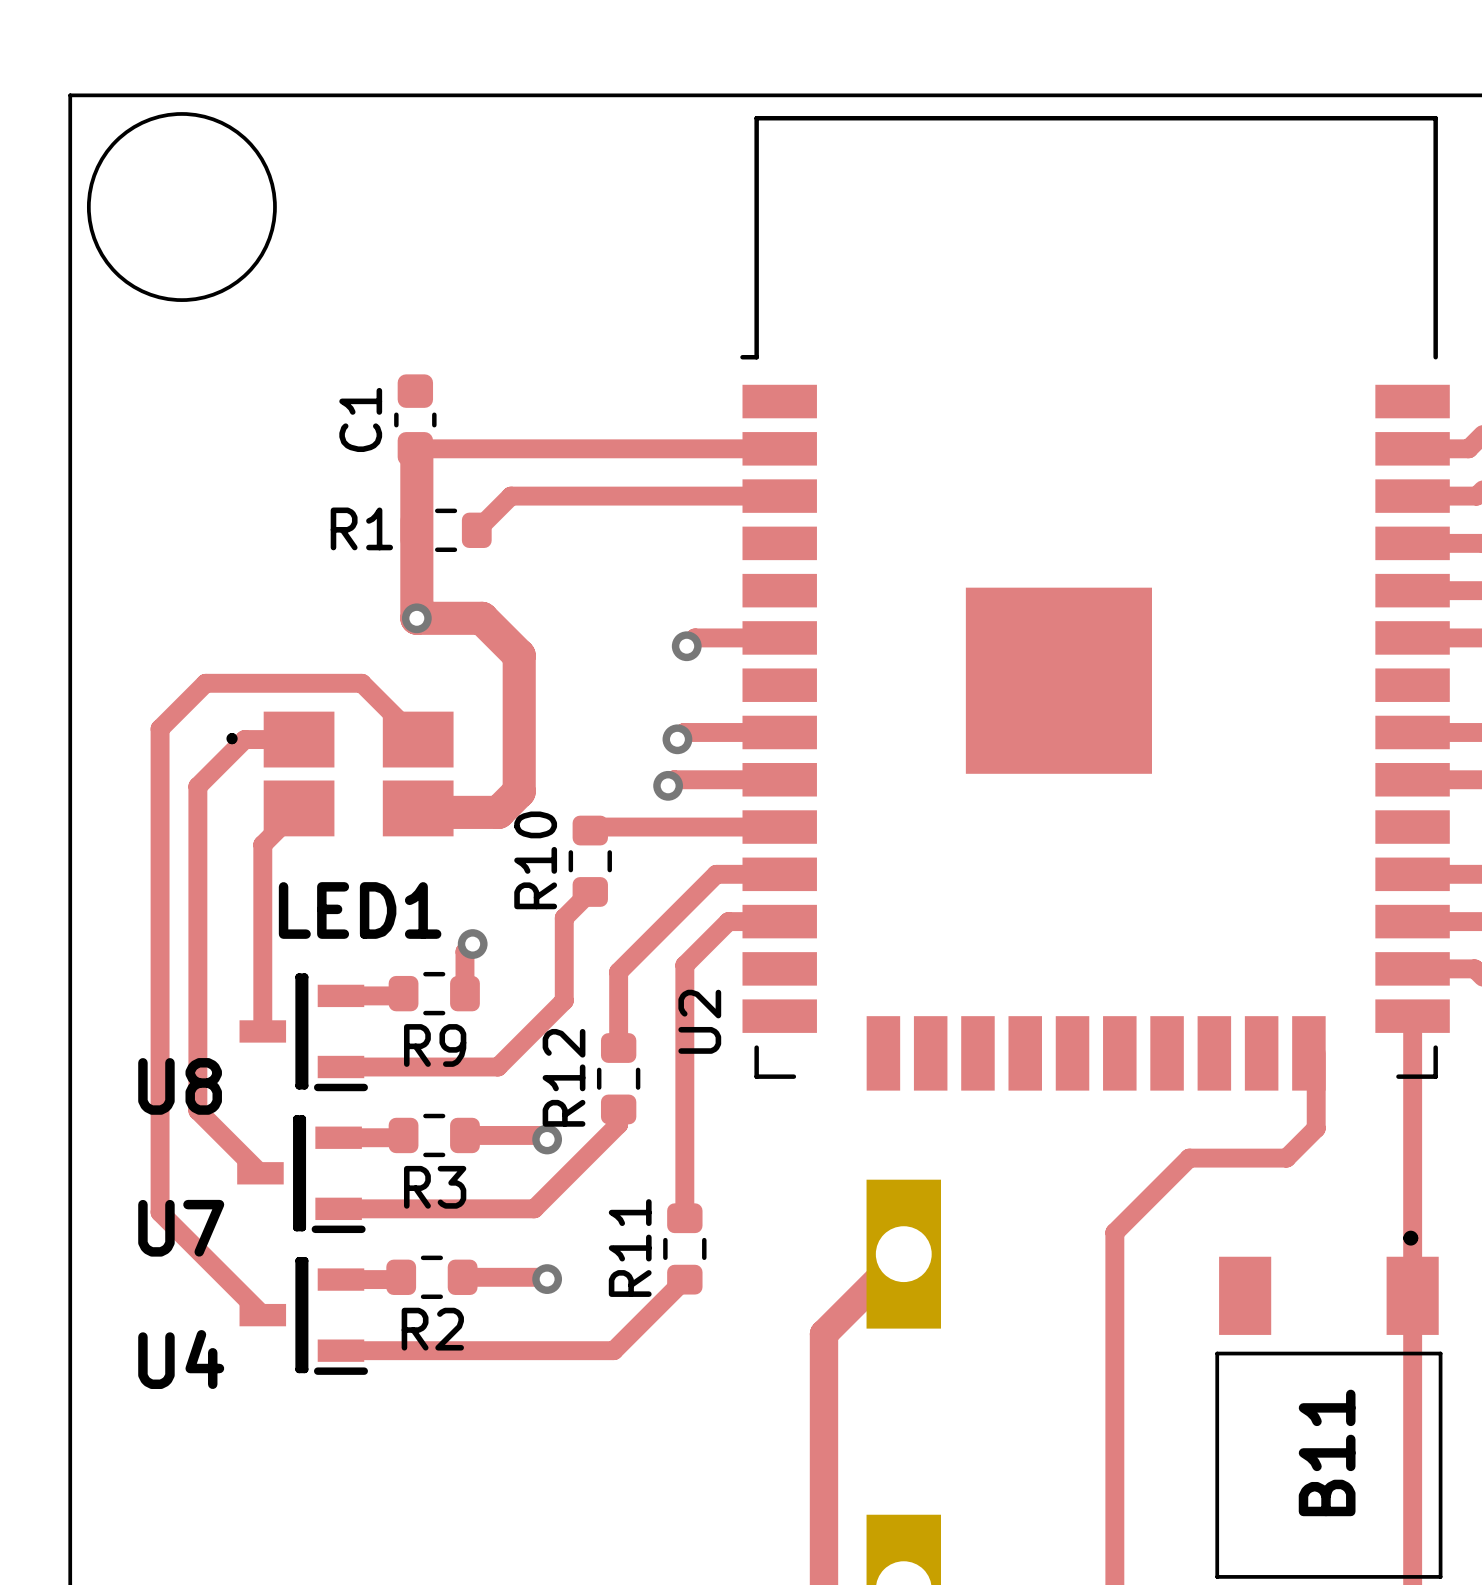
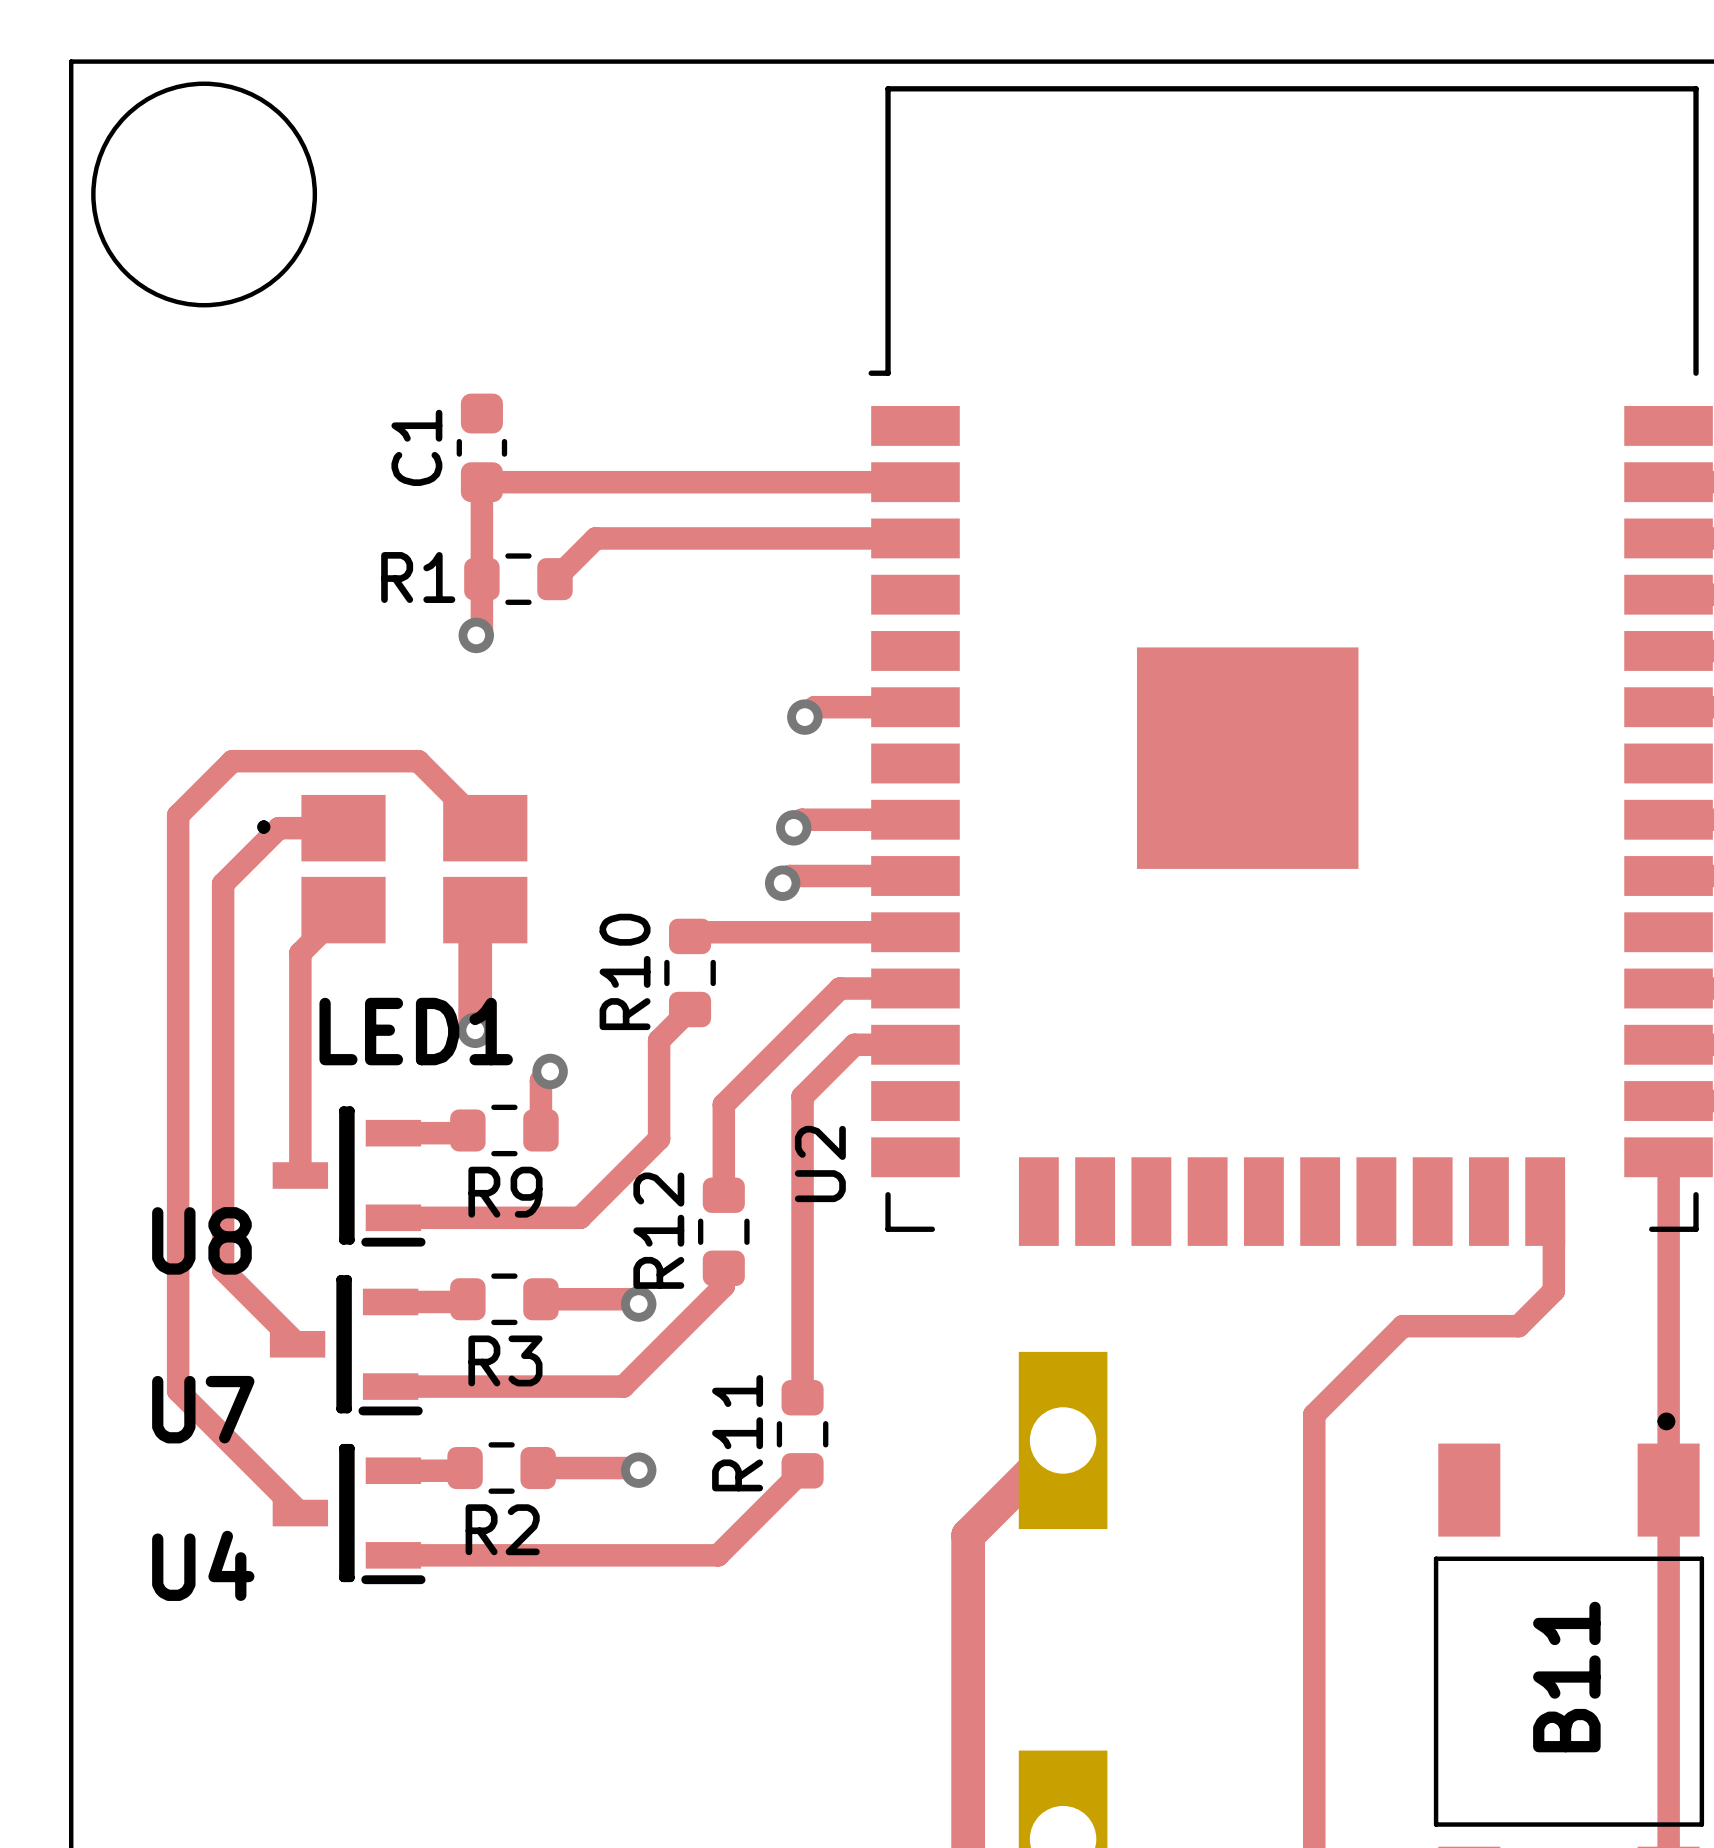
track: none -> (481, 482) (481, 629) (476, 635)
track: (415, 452) (416, 618) (481, 618) (519, 655) (519, 791) (498, 812) (418, 812) -> none
via position: (416, 618) -> (476, 635)
track: none -> (485, 910) (475, 920) (475, 1030)
via: none -> (475, 1030)

